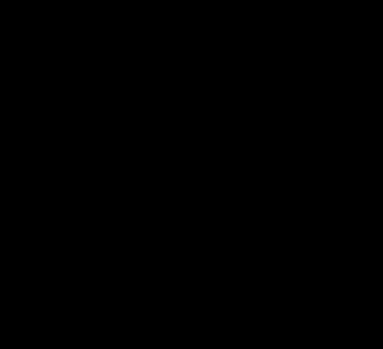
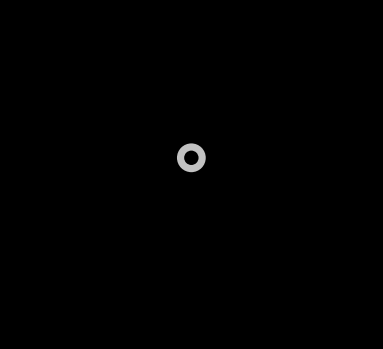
via: none -> (191, 157)

